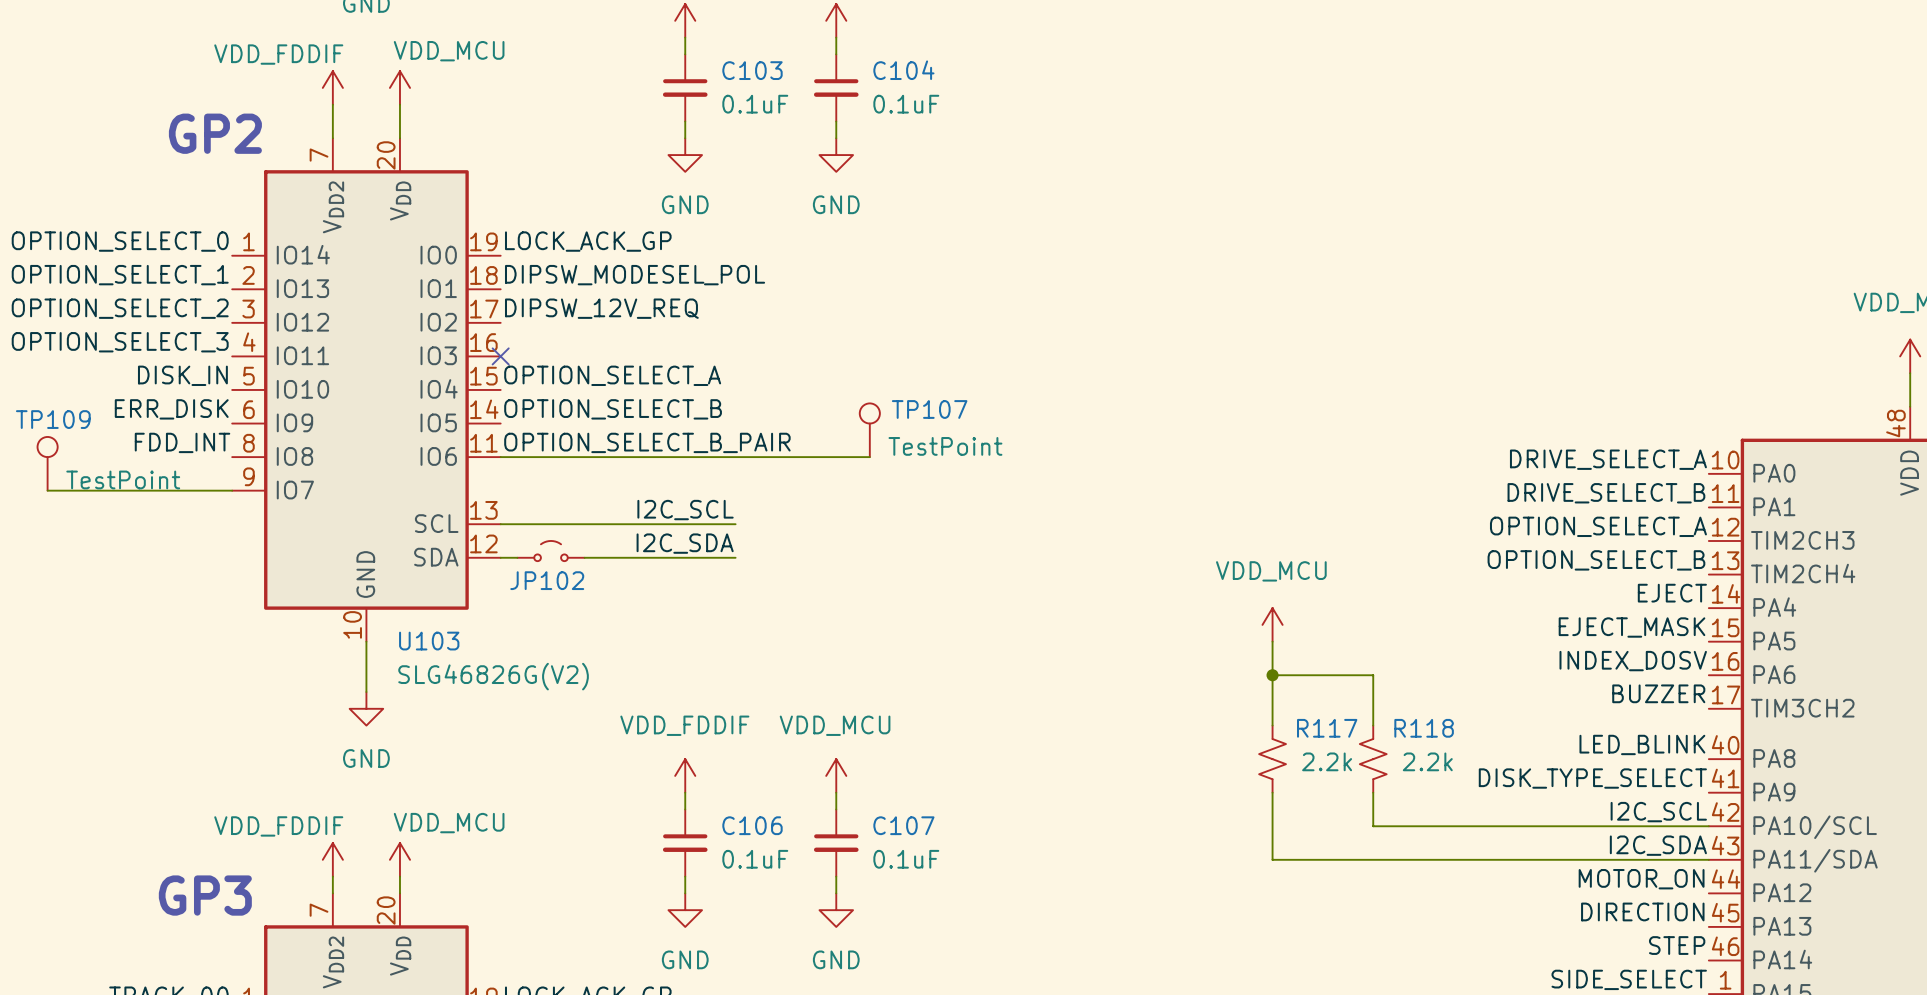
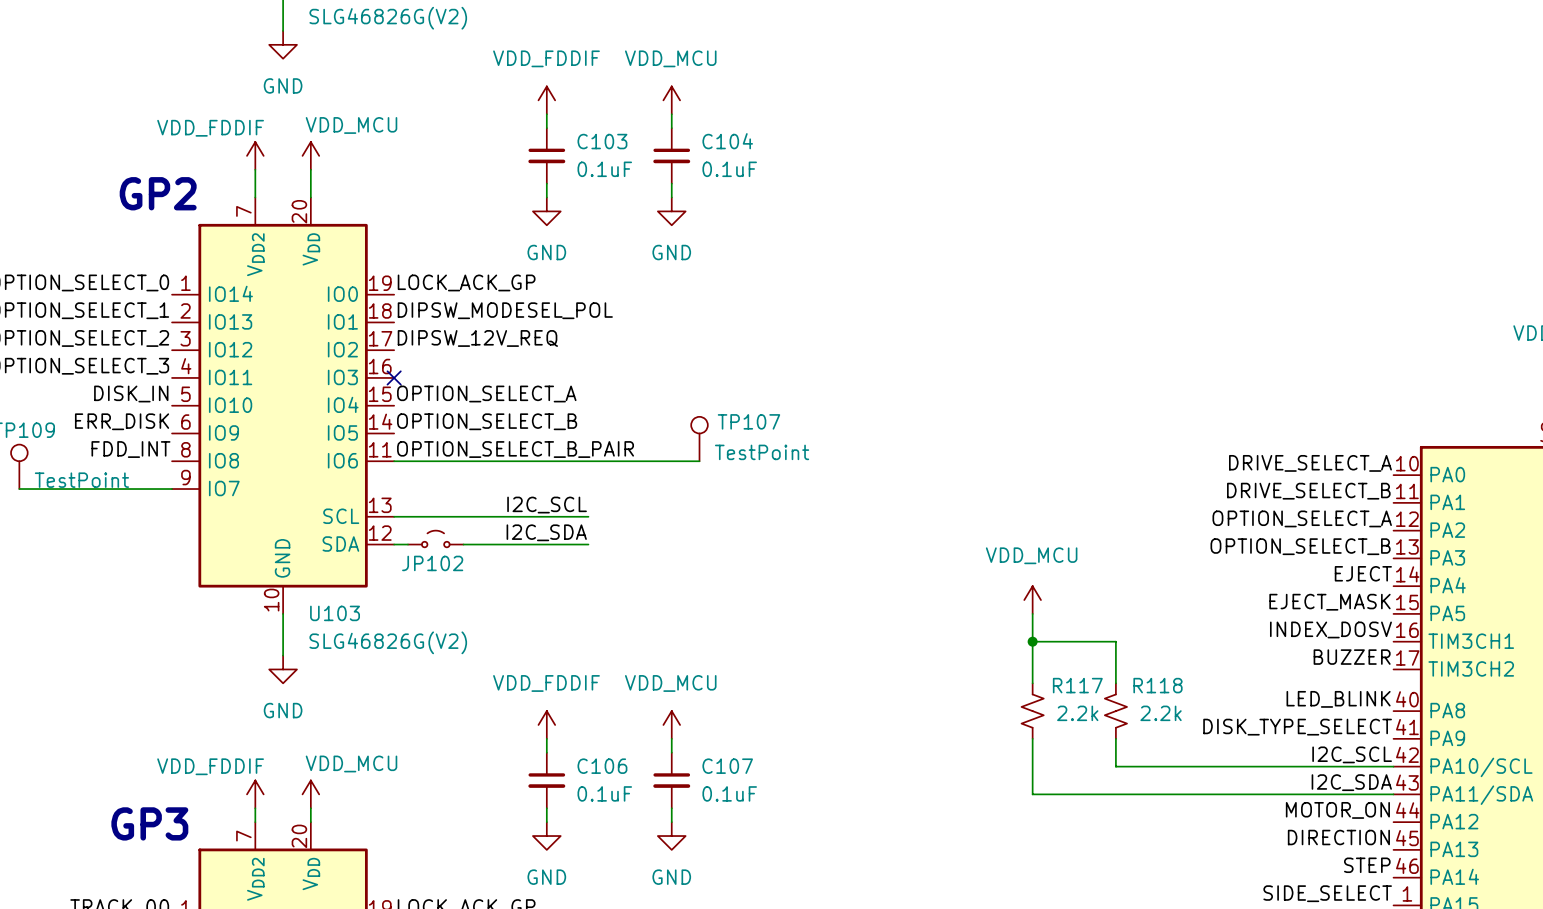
part pin name: TIM2CH3 (1802, 540) -> PA2 (1447, 530)
part pin name: TIM2CH4 (1803, 573) -> PA3 (1447, 557)
part pin name: PA6 (1774, 674) -> TIM3CH1 (1471, 641)

